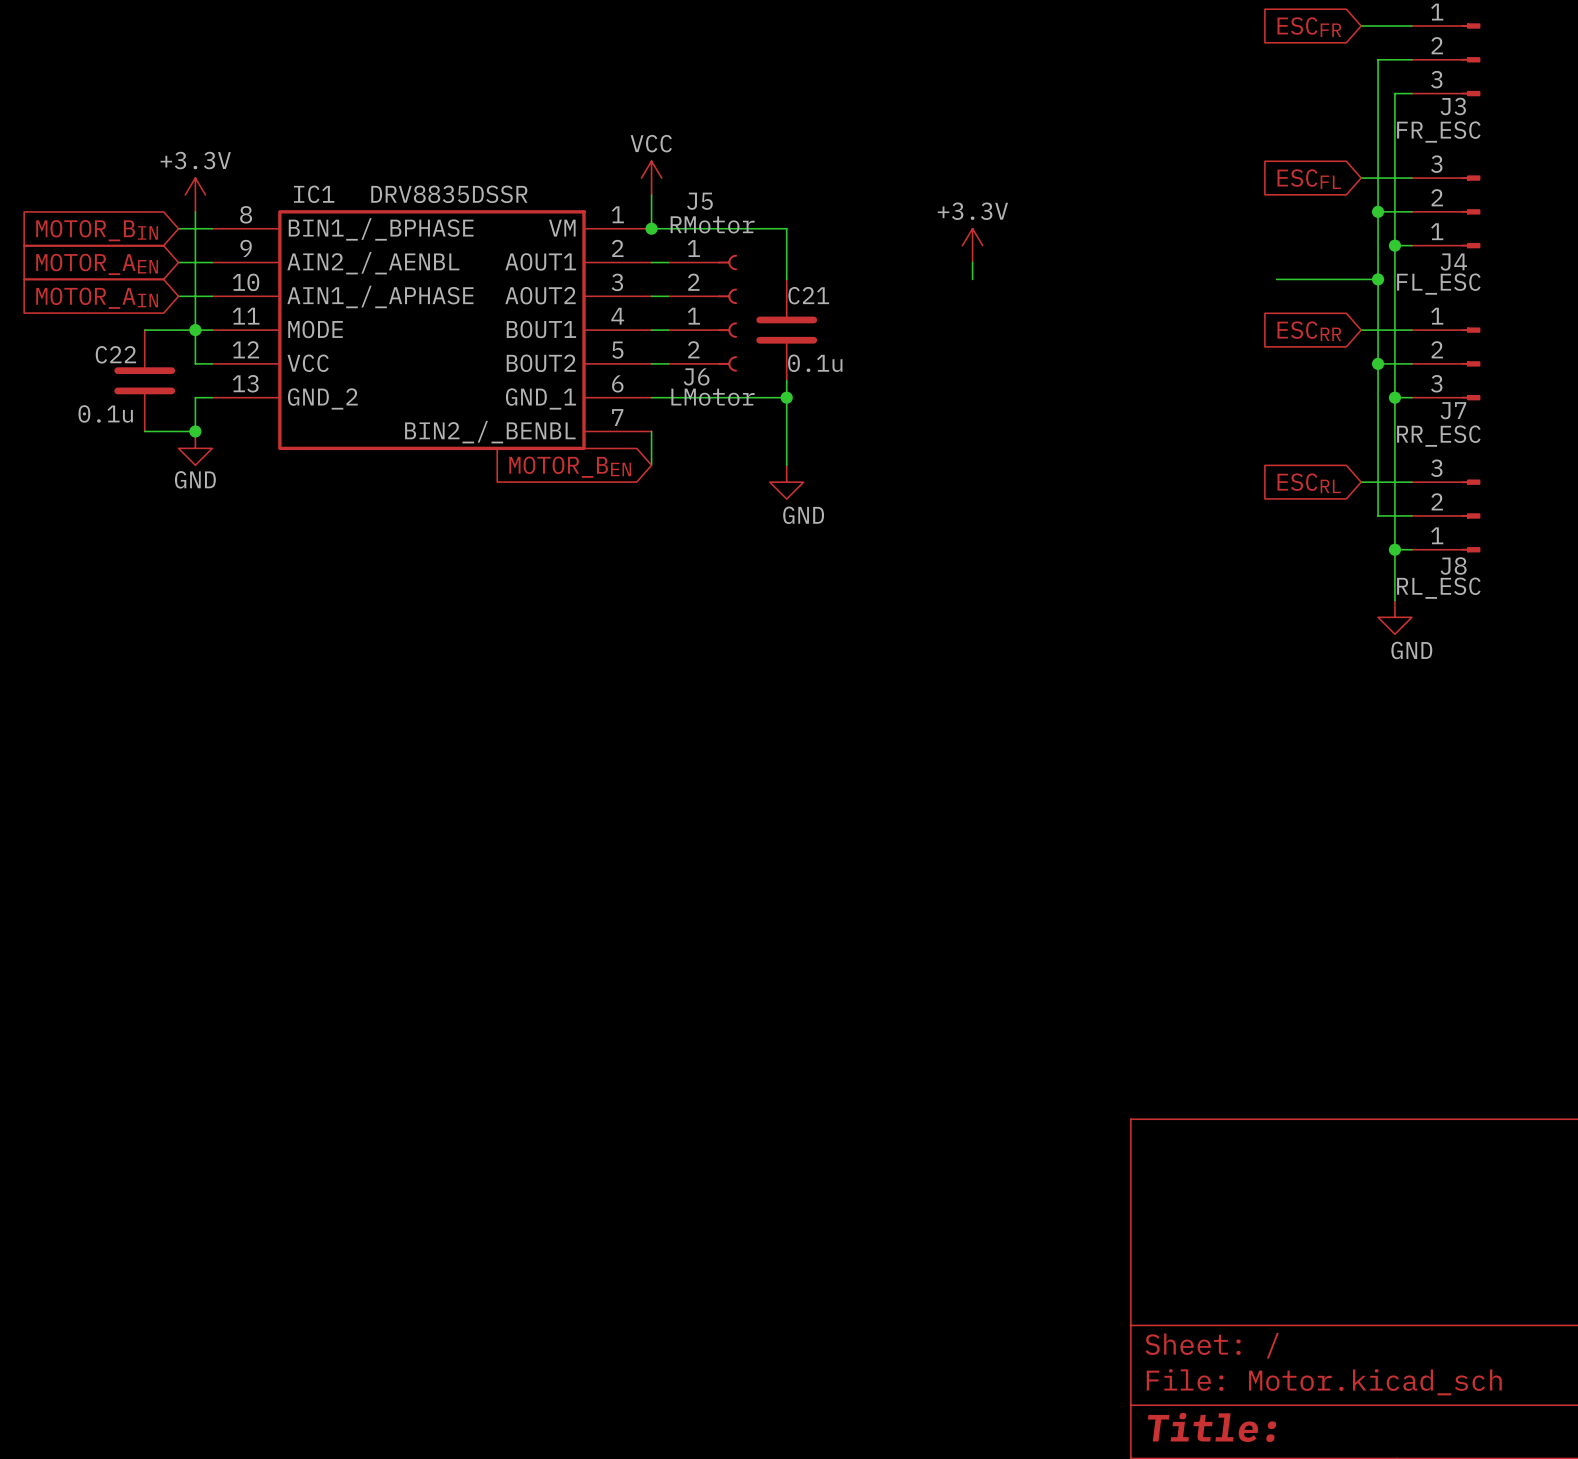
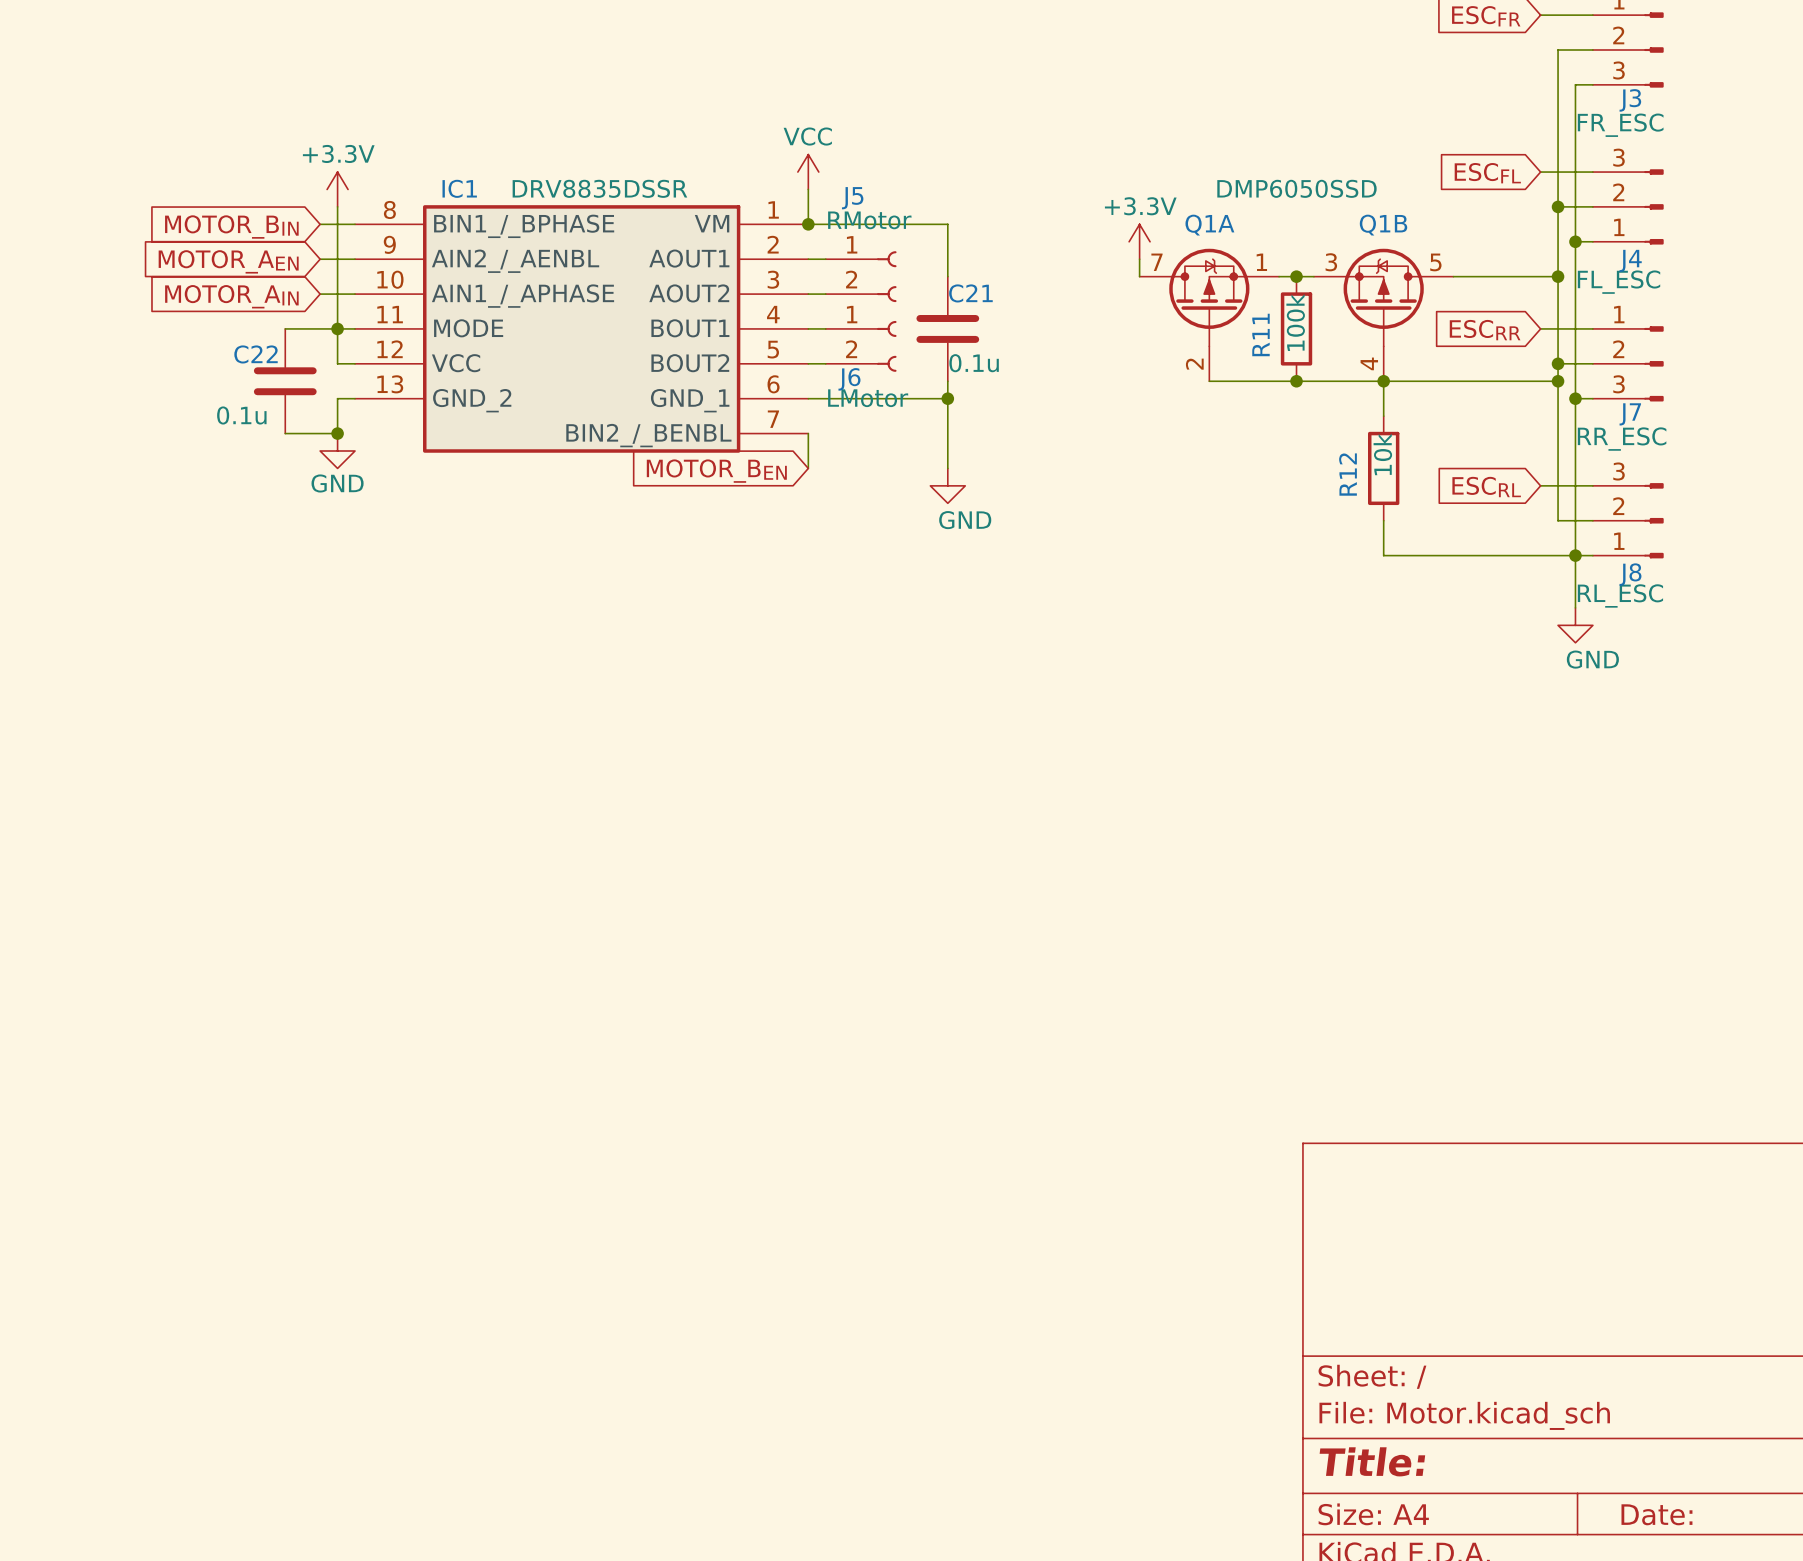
wire: none -> (1279, 276) (1313, 276)
junction: none -> (1296, 276)
Q1A: none -> DMP6050SSD (1209, 315)
Q1B: none -> (1383, 315)
R11: none -> 100k (1296, 328)
wire: none -> (1209, 381) (1558, 381)
junction: none -> (1296, 381)
wire: none -> (1383, 381) (1383, 416)
junction: none -> (1383, 381)
junction: none -> (1558, 381)
R12: none -> 10k (1383, 468)
wire: none -> (1383, 520) (1383, 555) (1575, 555)

